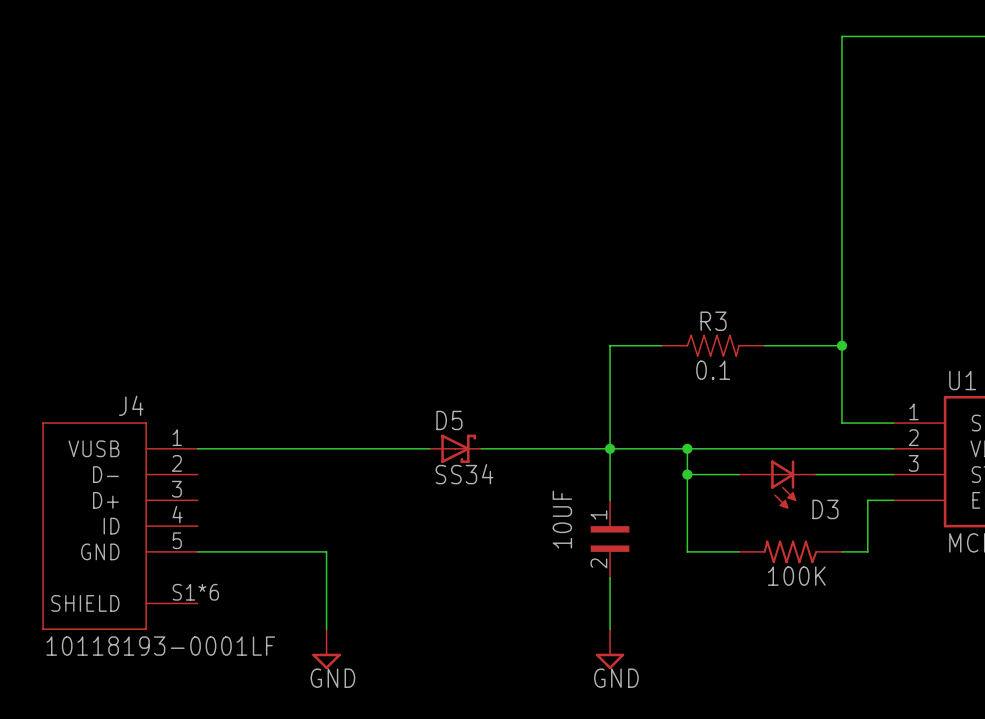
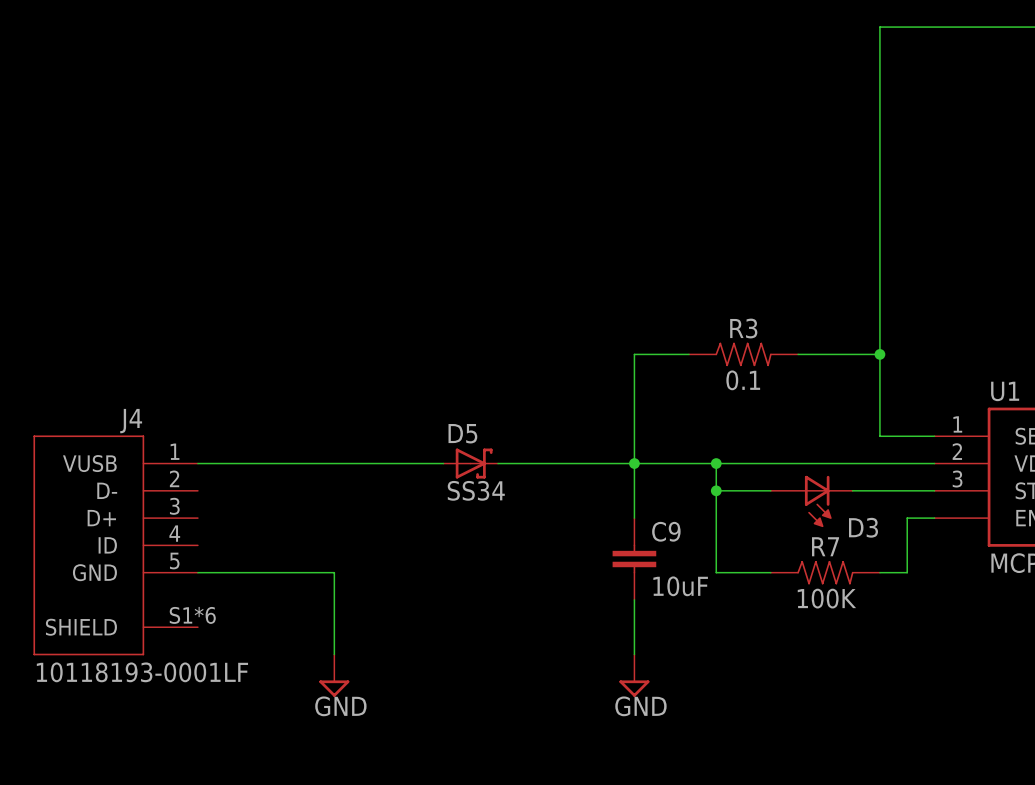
10UF: (610, 539) -> none
C9: none -> 10uF (634, 559)
100K: (790, 551) -> none
R7: none -> 100K (825, 572)

